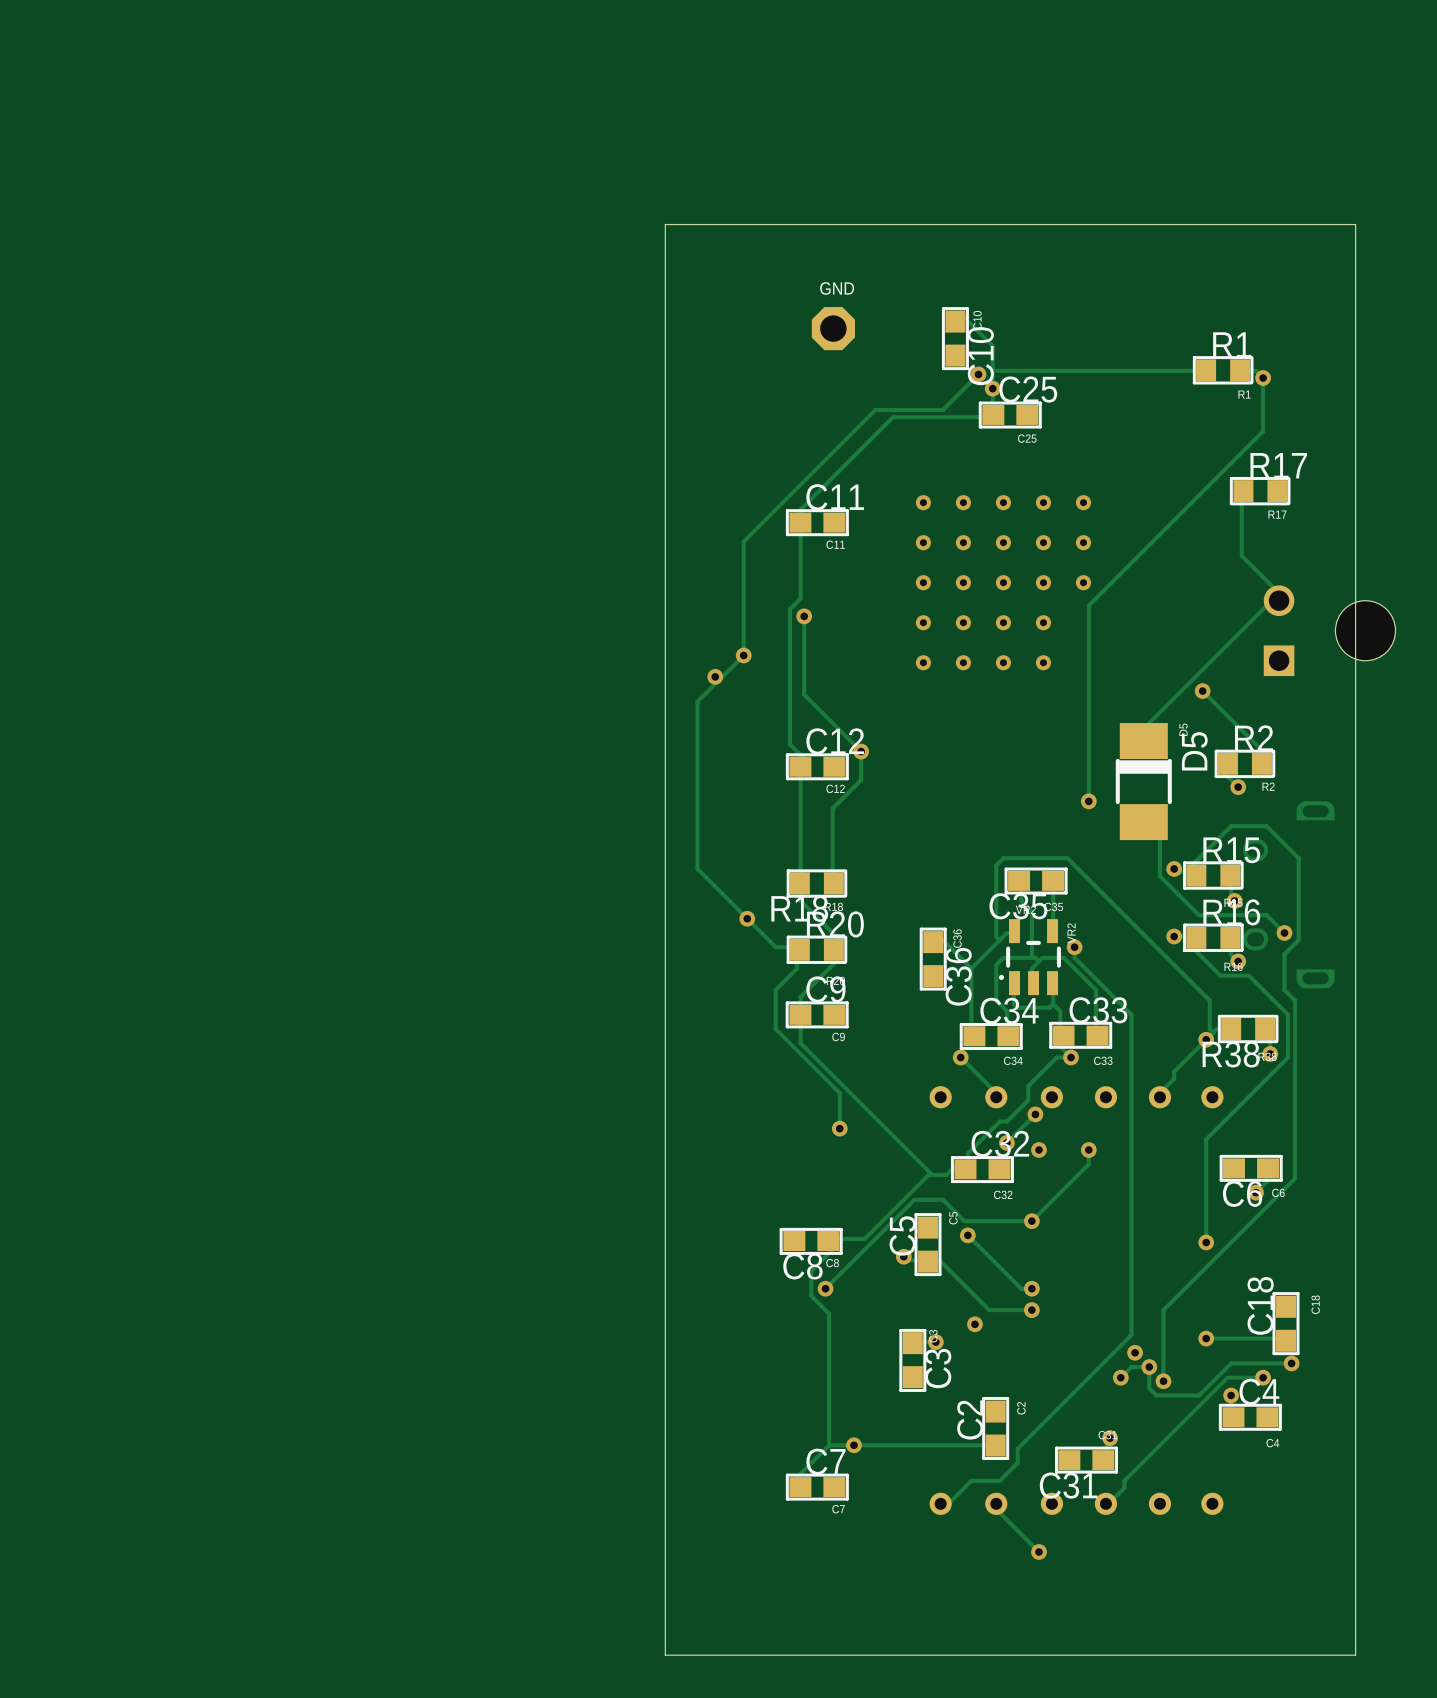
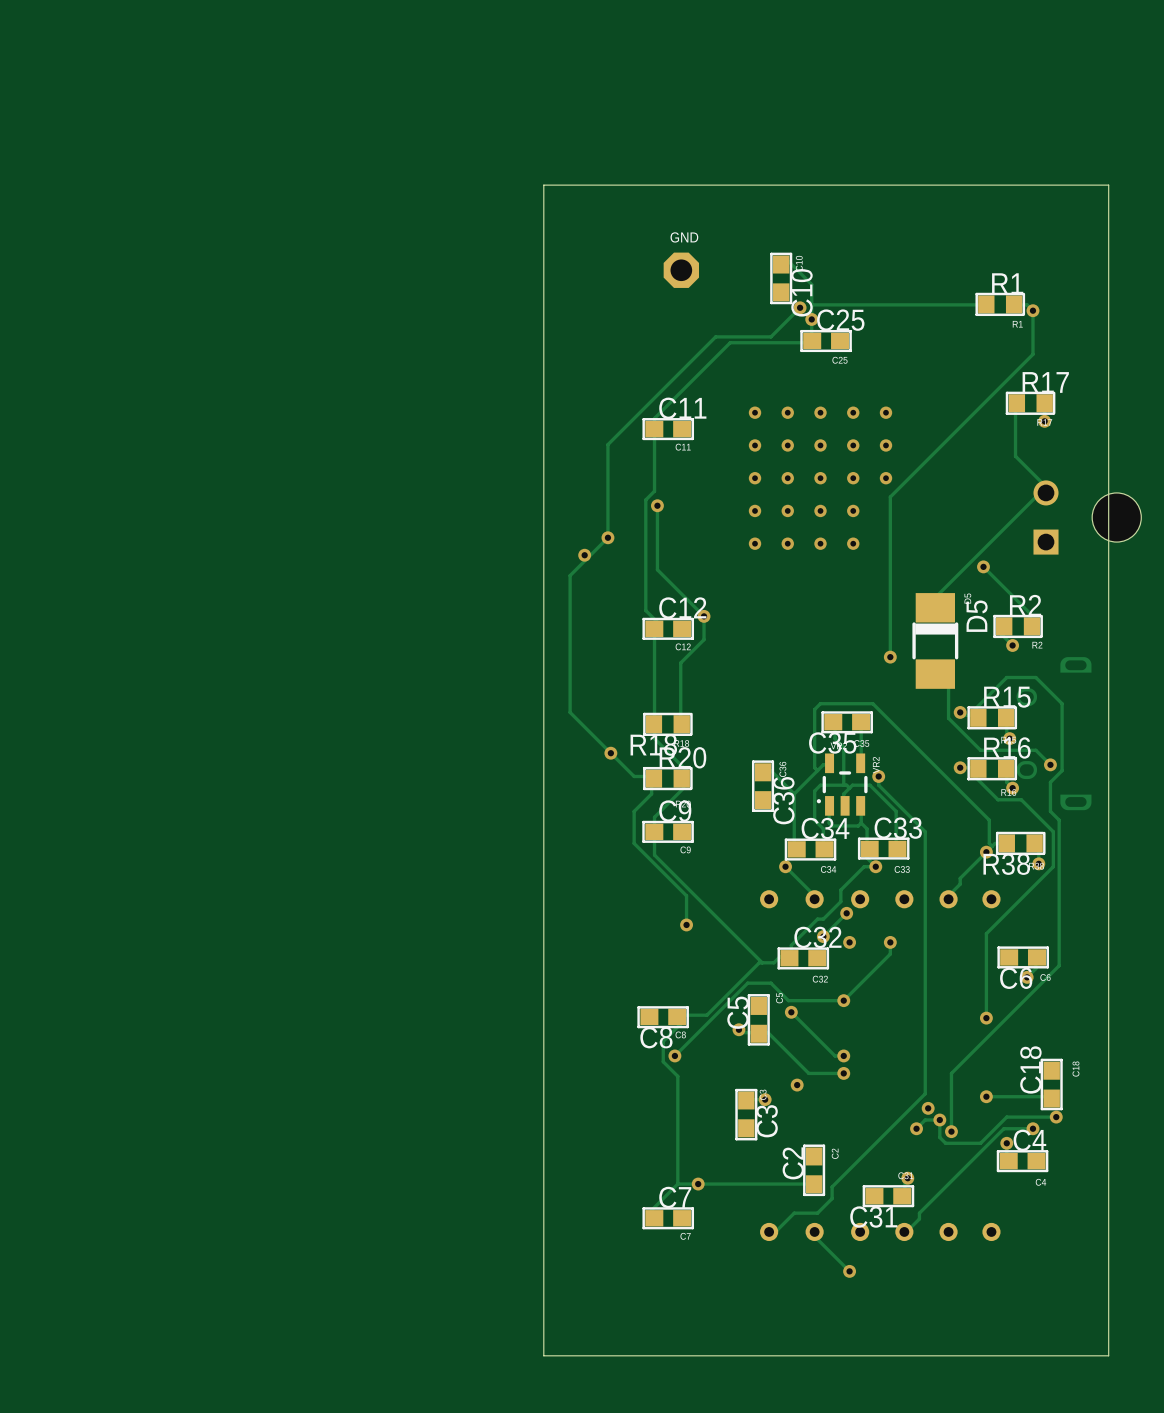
via: none -> (1044, 421)

